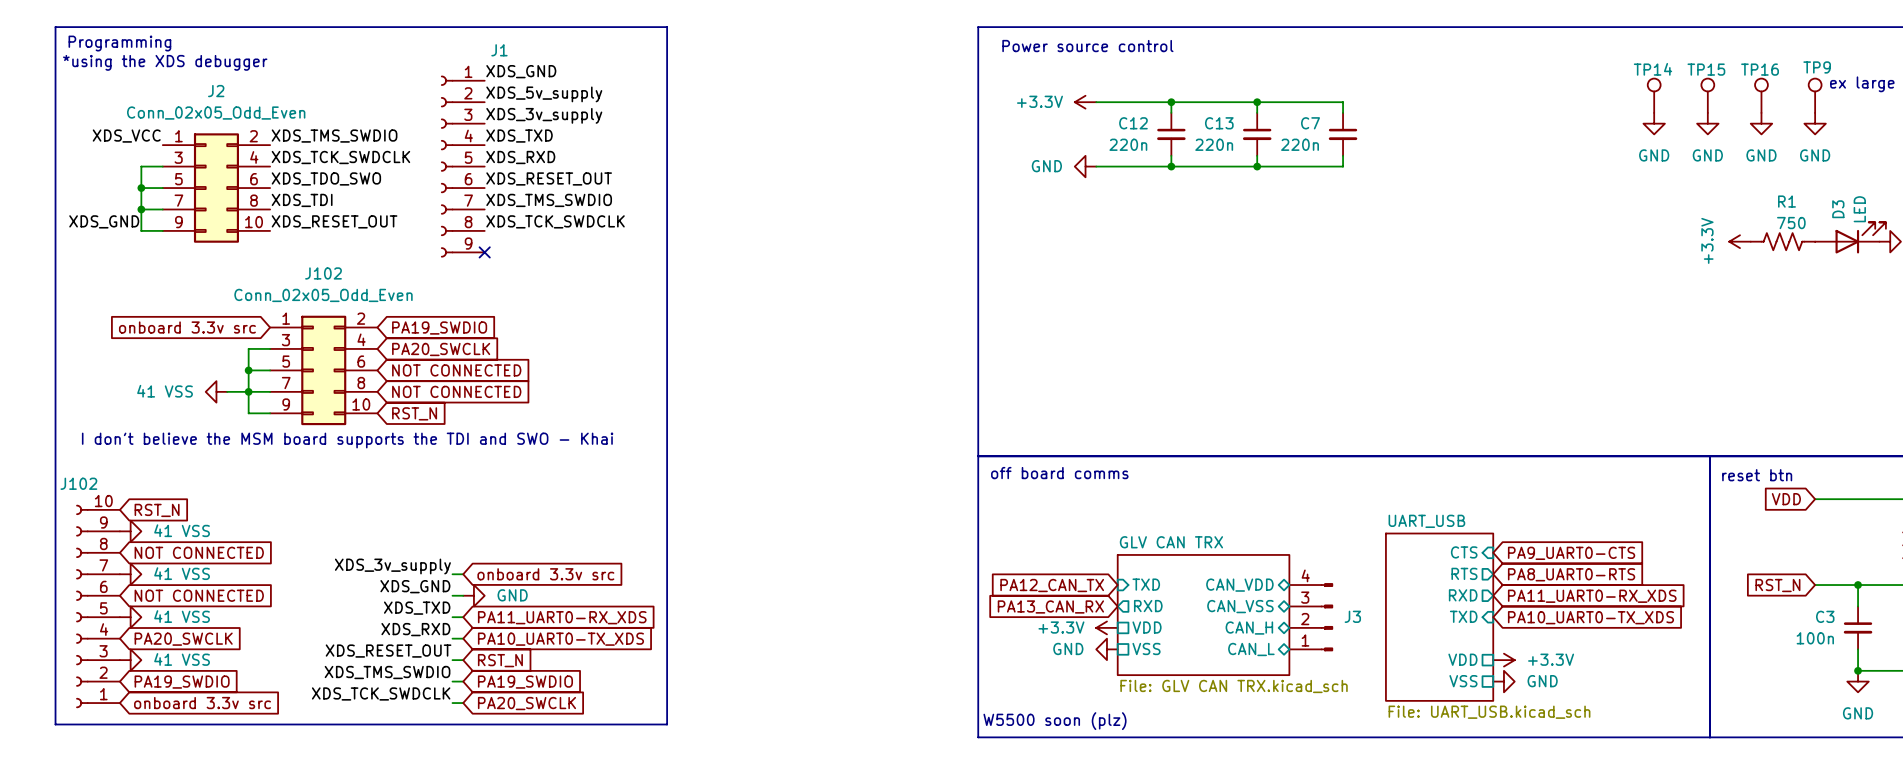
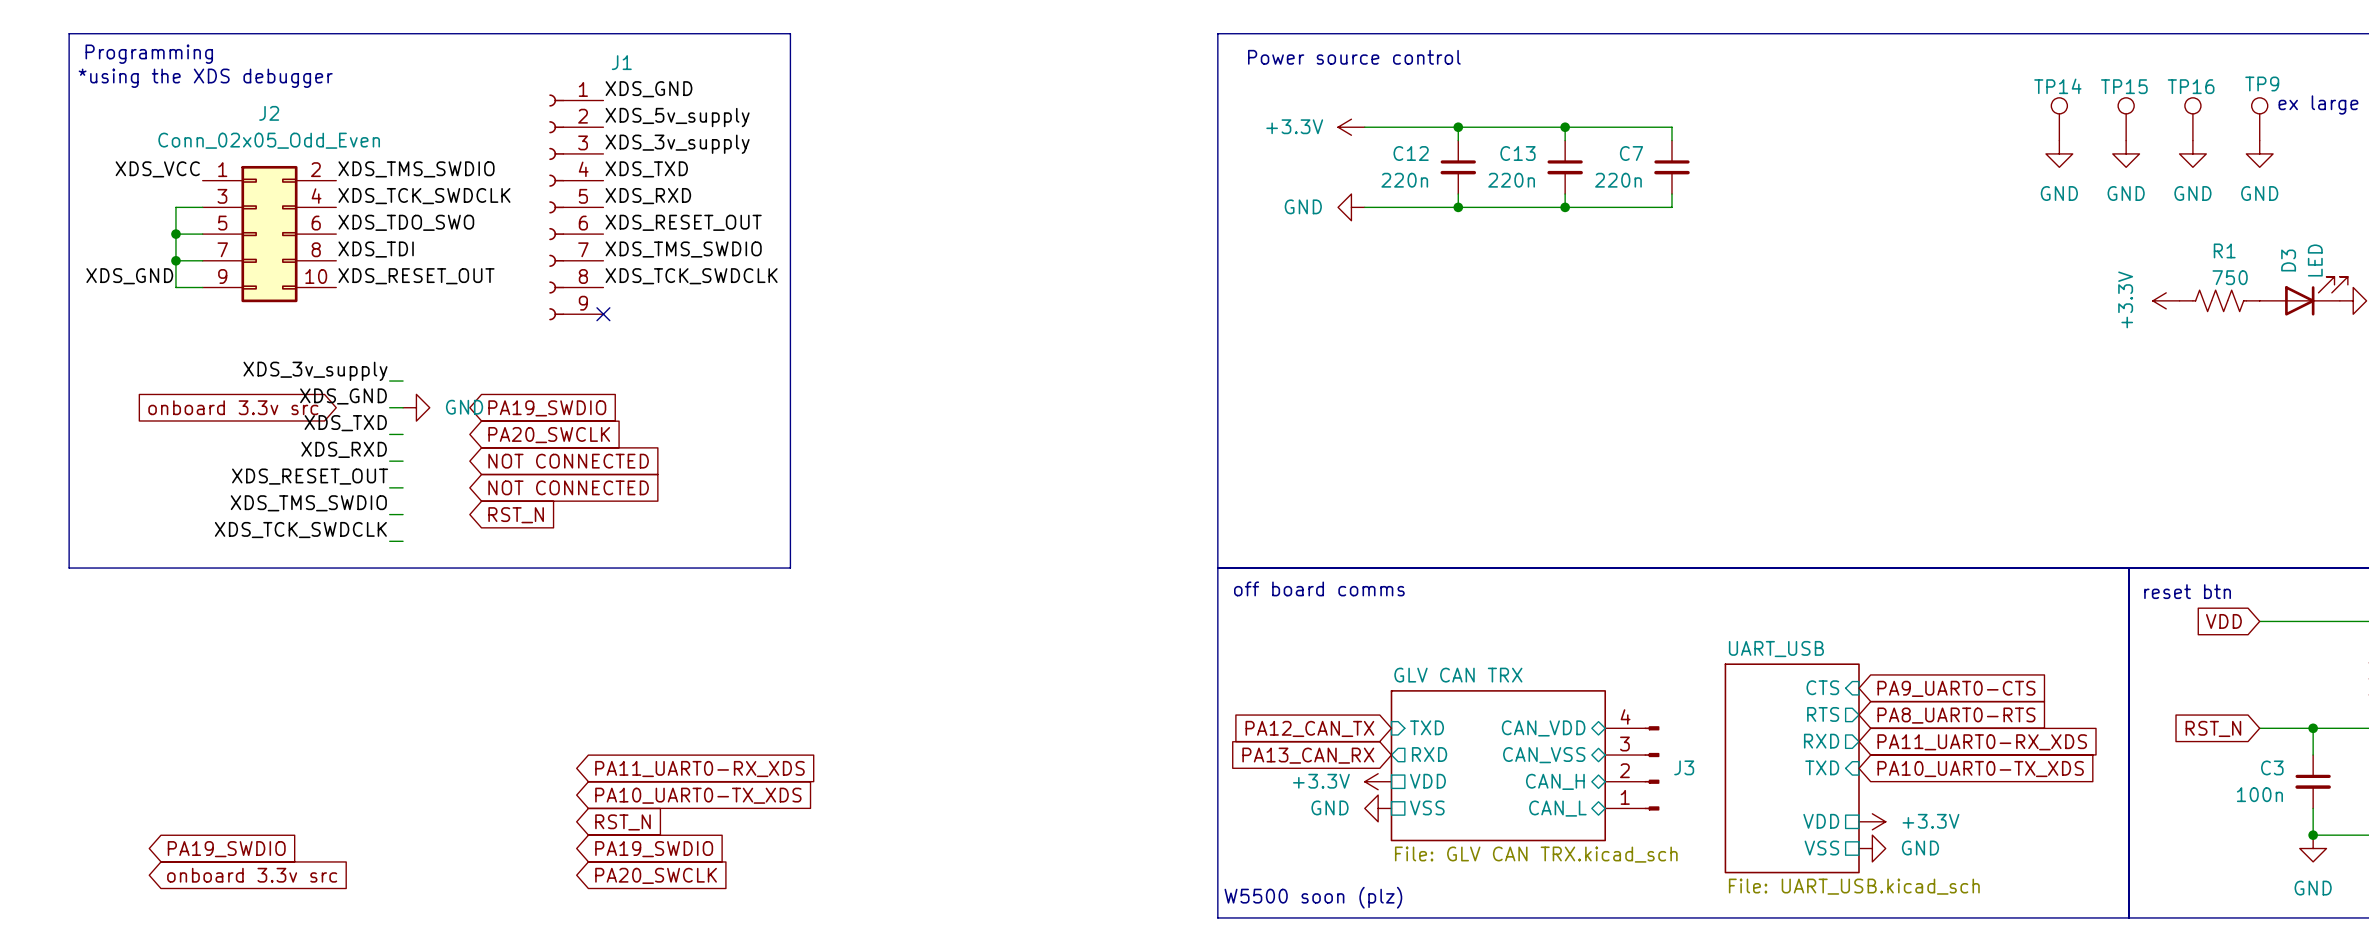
line: (634, 27) (667, 27) (667, 724) (55, 724) (55, 456) -> (790, 33) (790, 568) (69, 568)
label: none -> XDS_3v_supply (315, 371)
wire: none -> (389, 381) (403, 381)
label: none -> XDS_GND (343, 396)
power symbol: none -> GND (416, 407)
label: none -> XDS_TXD (345, 423)
wire: (270, 348) (248, 348) (248, 413) (270, 413) -> none
label: none -> XDS_RXD (344, 449)
wire: (248, 370) (270, 370) -> none
junction: (248, 370) -> none
J102: Conn_02x05_Odd_Even (323, 370) -> none
label: none -> XDS_RESET_OUT (310, 476)
power symbol: 41 VSS (216, 391) -> none
wire: (227, 391) (270, 391) -> none
junction: (248, 391) -> none
label: none -> XDS_TMS_SWDIO (308, 503)
label: none -> XDS_TCK_SWDCLK (300, 530)
text: I don't believe the MSM board supports the TDI and SWO - Khai (347, 440) -> none
global label: RST_N (157, 510) -> none
power symbol: 41 VSS (130, 531) -> none
global label: NOT CONNECTED (199, 552) -> none
label: XDS_3v_supply (392, 566) -> none
power symbol: 41 VSS (130, 574) -> none
wire: (452, 574) (463, 574) -> (389, 541) (403, 541)
global label: onboard 3.3v src (545, 574) -> none
label: XDS_GND (415, 586) -> none
global label: NOT CONNECTED (199, 595) -> none
wire: (452, 595) (463, 595) -> none
power symbol: GND (473, 595) -> none
J102: (98, 606) -> none
label: XDS_TXD (417, 608) -> none
power symbol: 41 VSS (130, 617) -> none
wire: (452, 617) (463, 617) -> none
label: XDS_RXD (415, 629) -> none
wire: (452, 638) (463, 638) -> none
global label: PA20_SWCLK (183, 639) -> none
label: XDS_RESET_OUT (388, 651) -> none
power symbol: 41 VSS (130, 660) -> none
wire: (452, 660) (463, 660) -> none
label: XDS_TMS_SWDIO (387, 672) -> none
wire: (452, 681) (463, 681) -> none
label: XDS_TCK_SWDCLK (381, 693) -> none
wire: (452, 703) (463, 703) -> none

